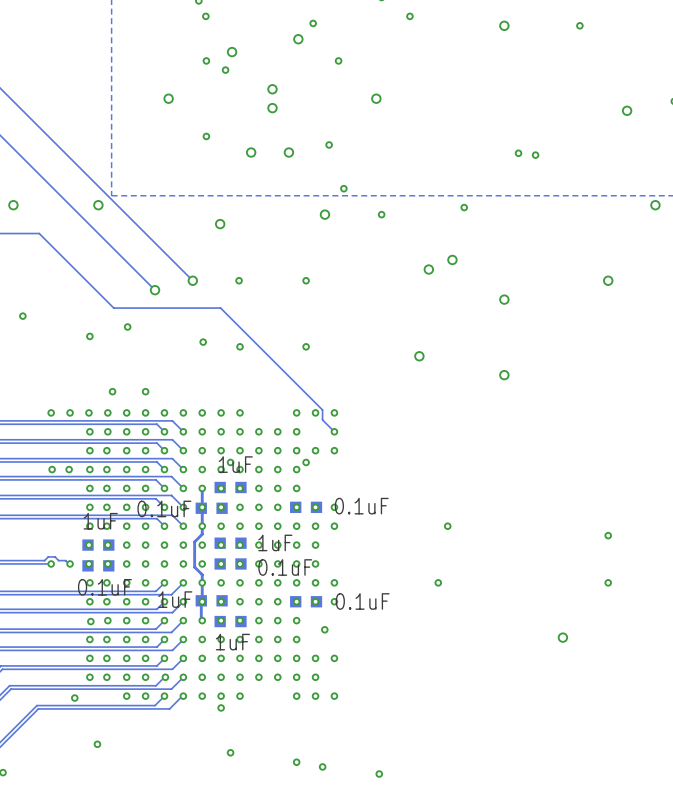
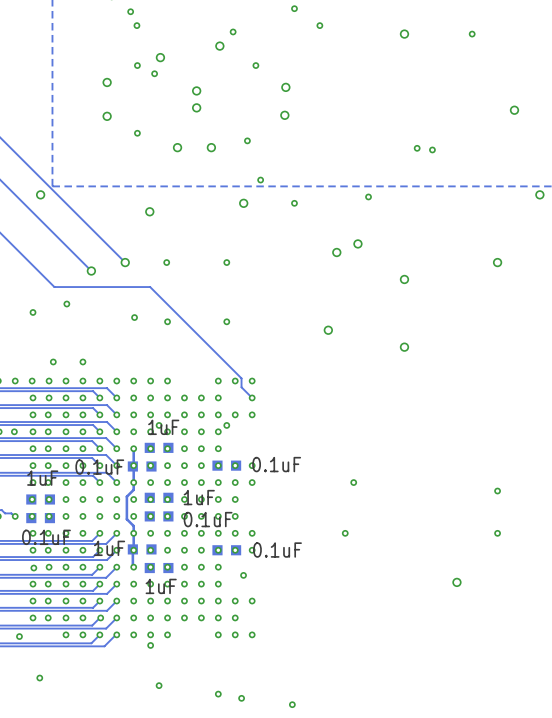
via: none -> (107, 82)
via: none -> (285, 87)
via: (168, 98) -> none
via: (376, 98) -> none
via: none -> (284, 115)
via: none -> (107, 116)

